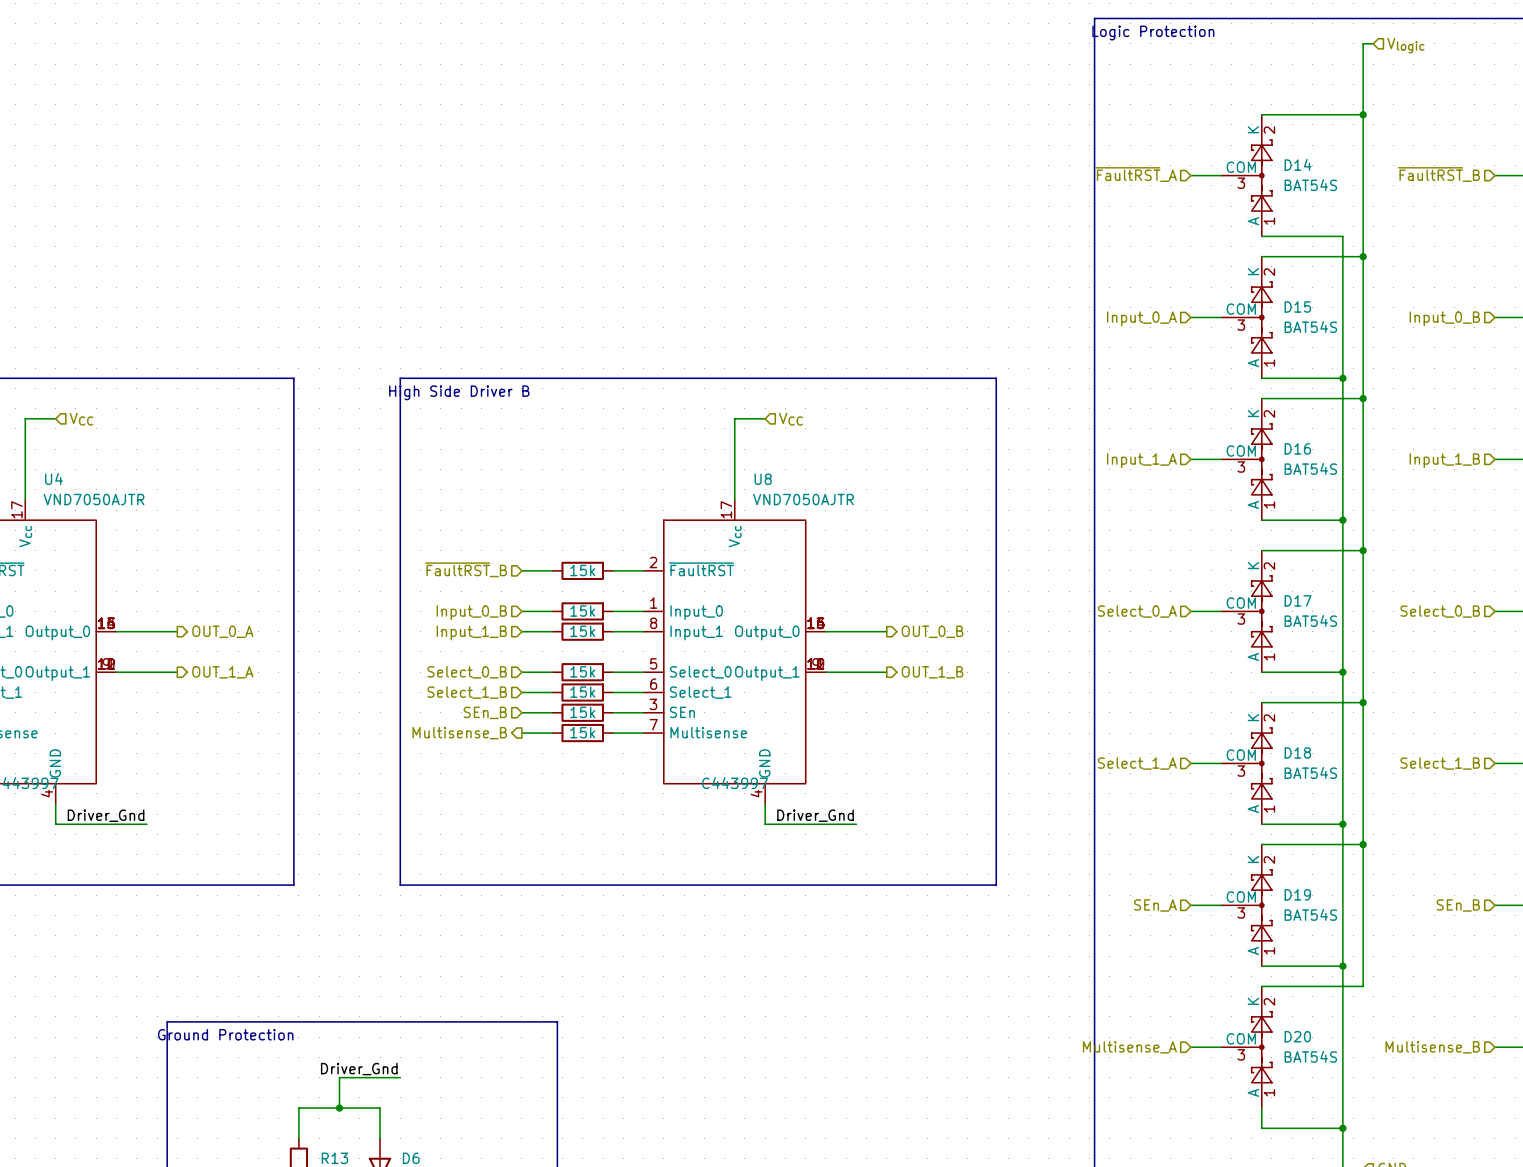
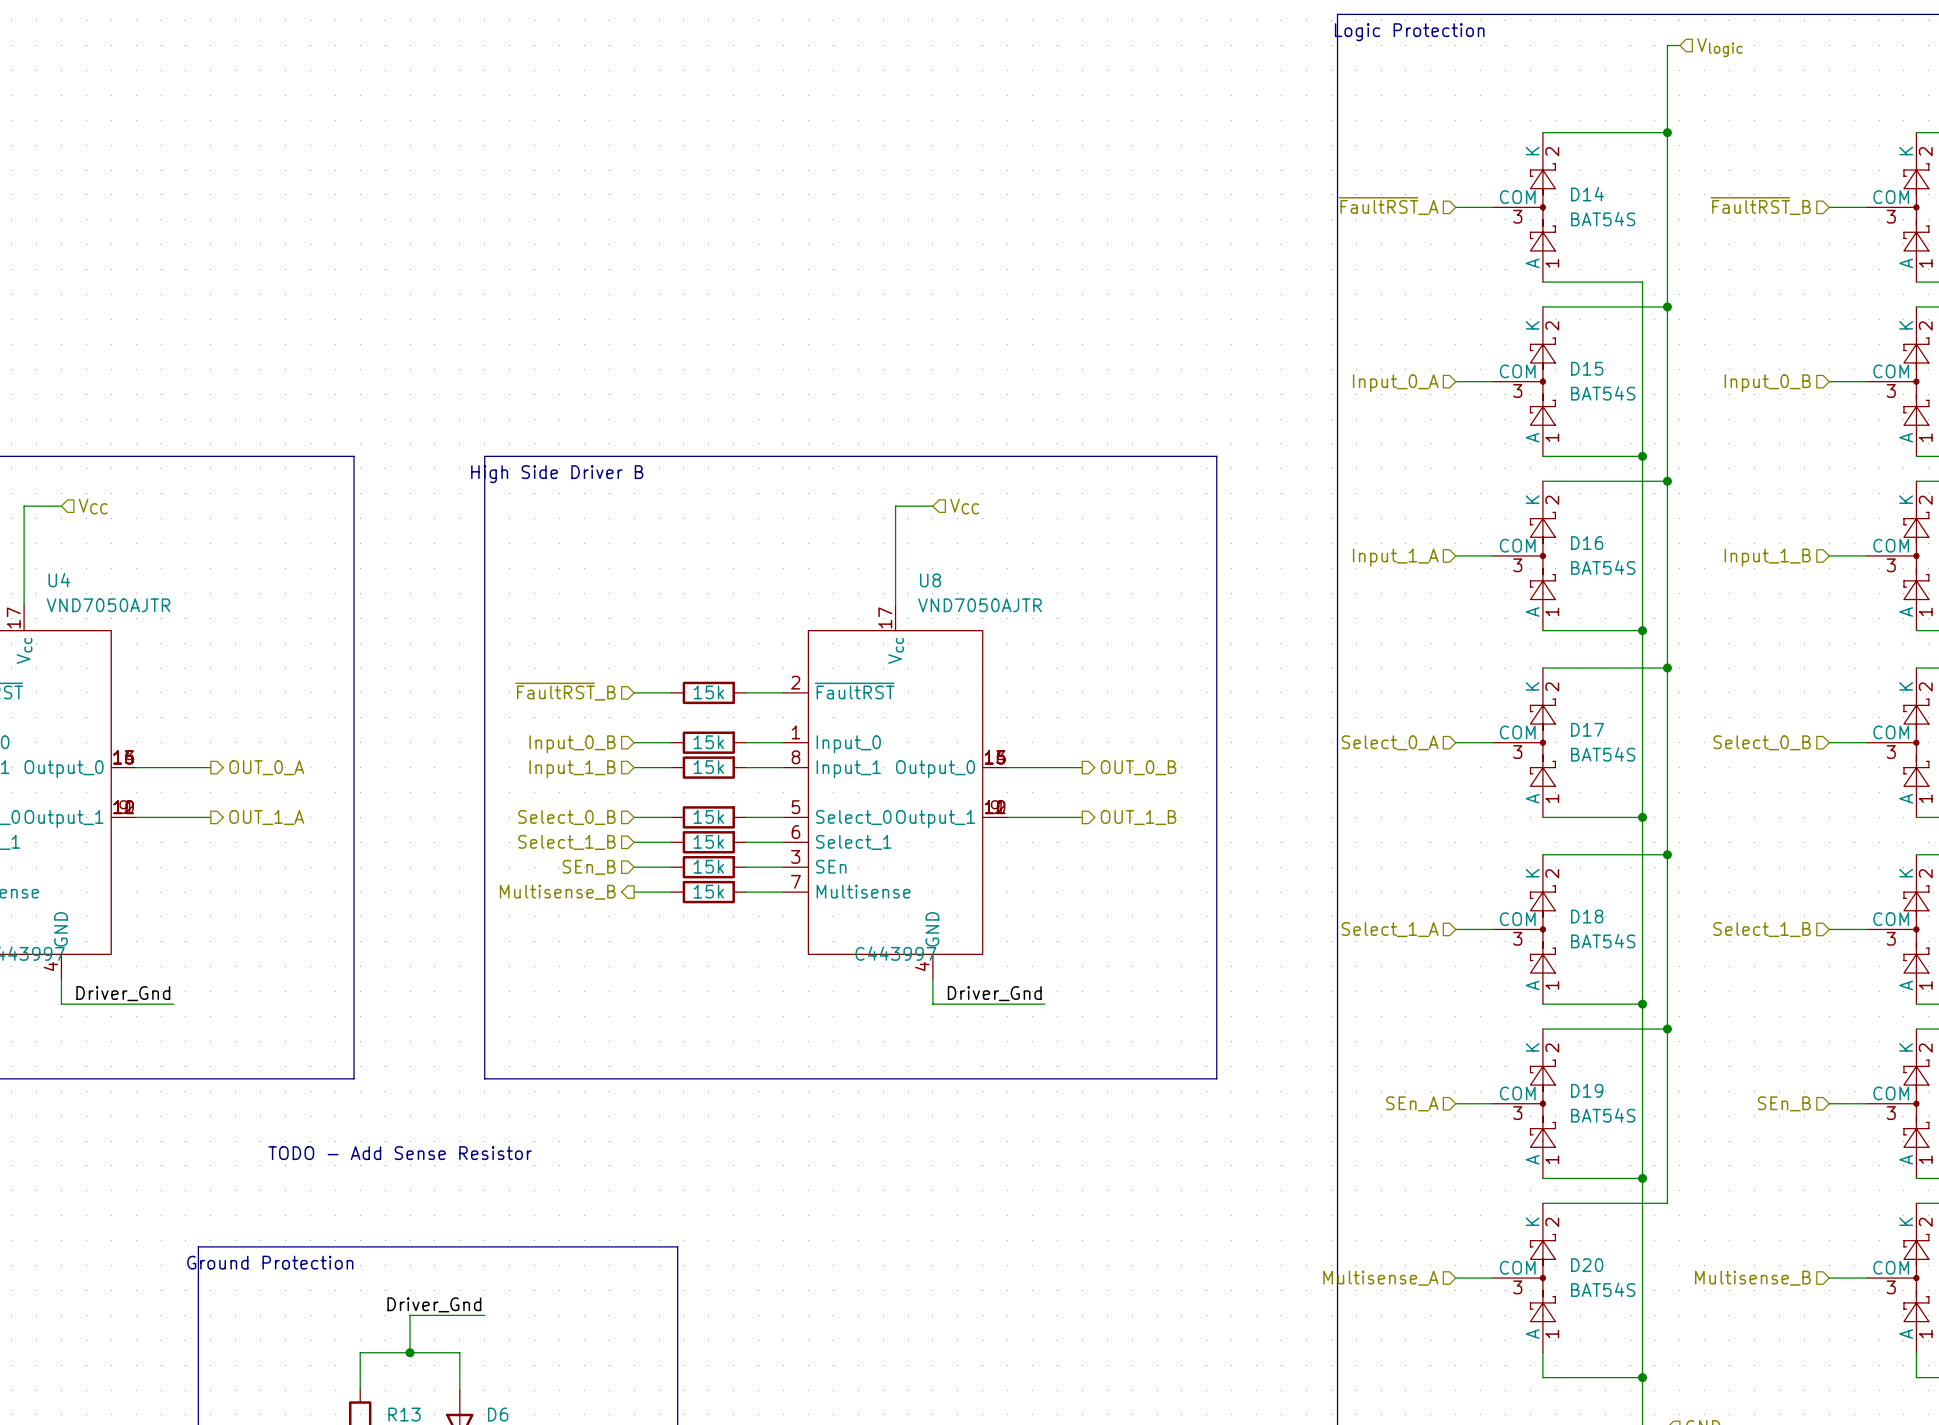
text: none -> TODO - Add Sense Resistor (400, 1153)

